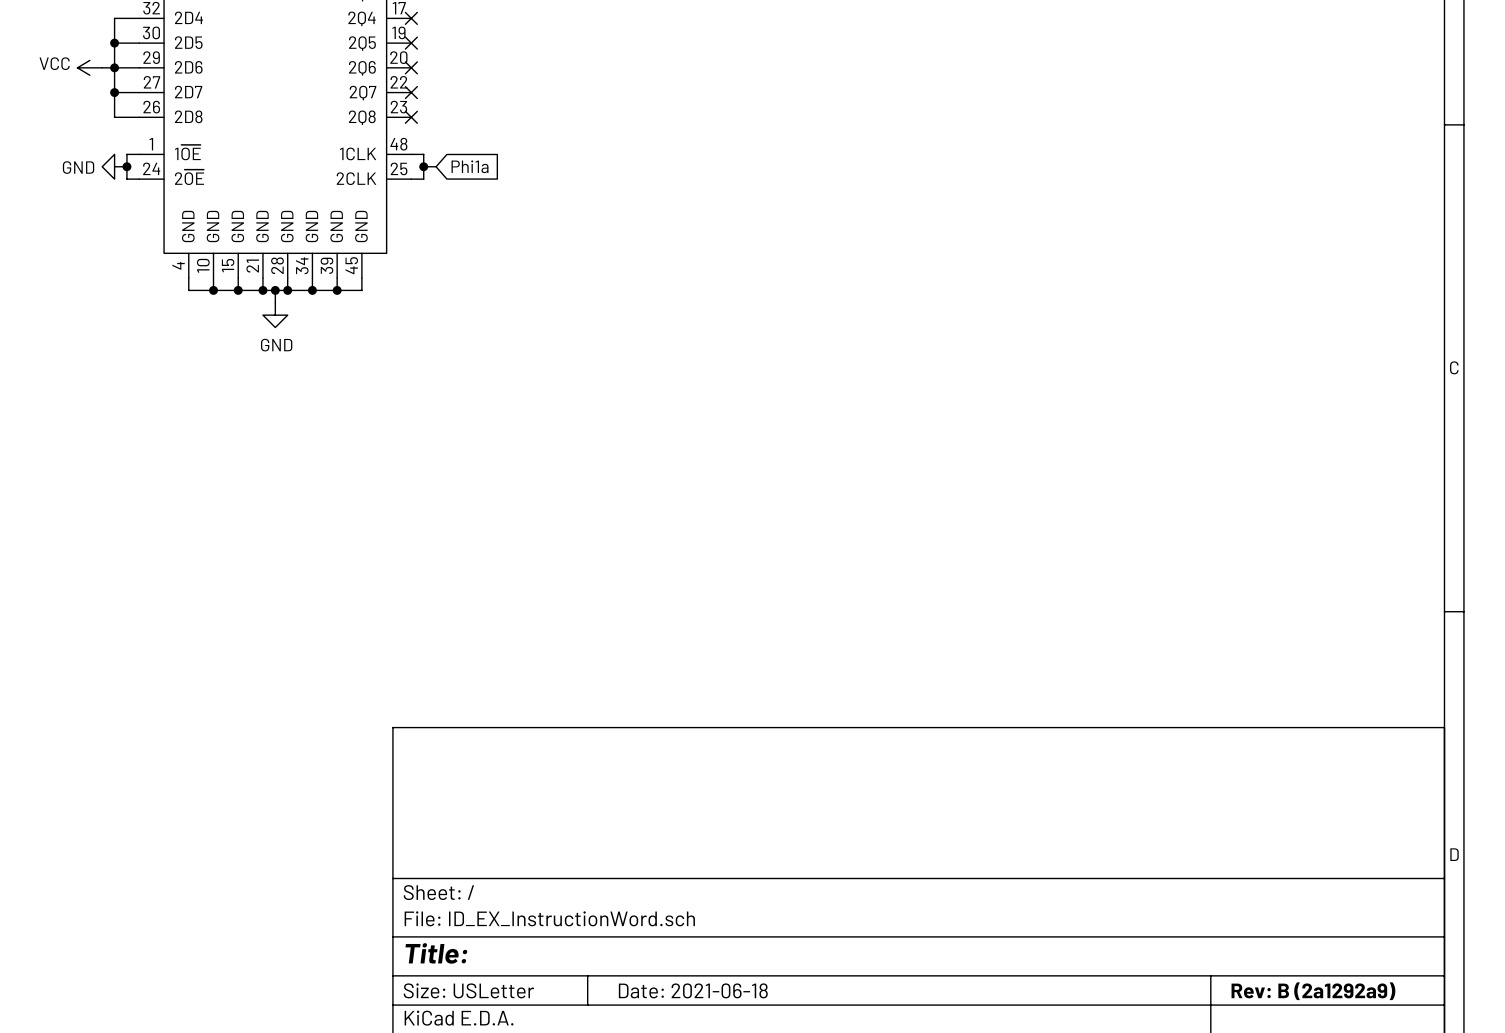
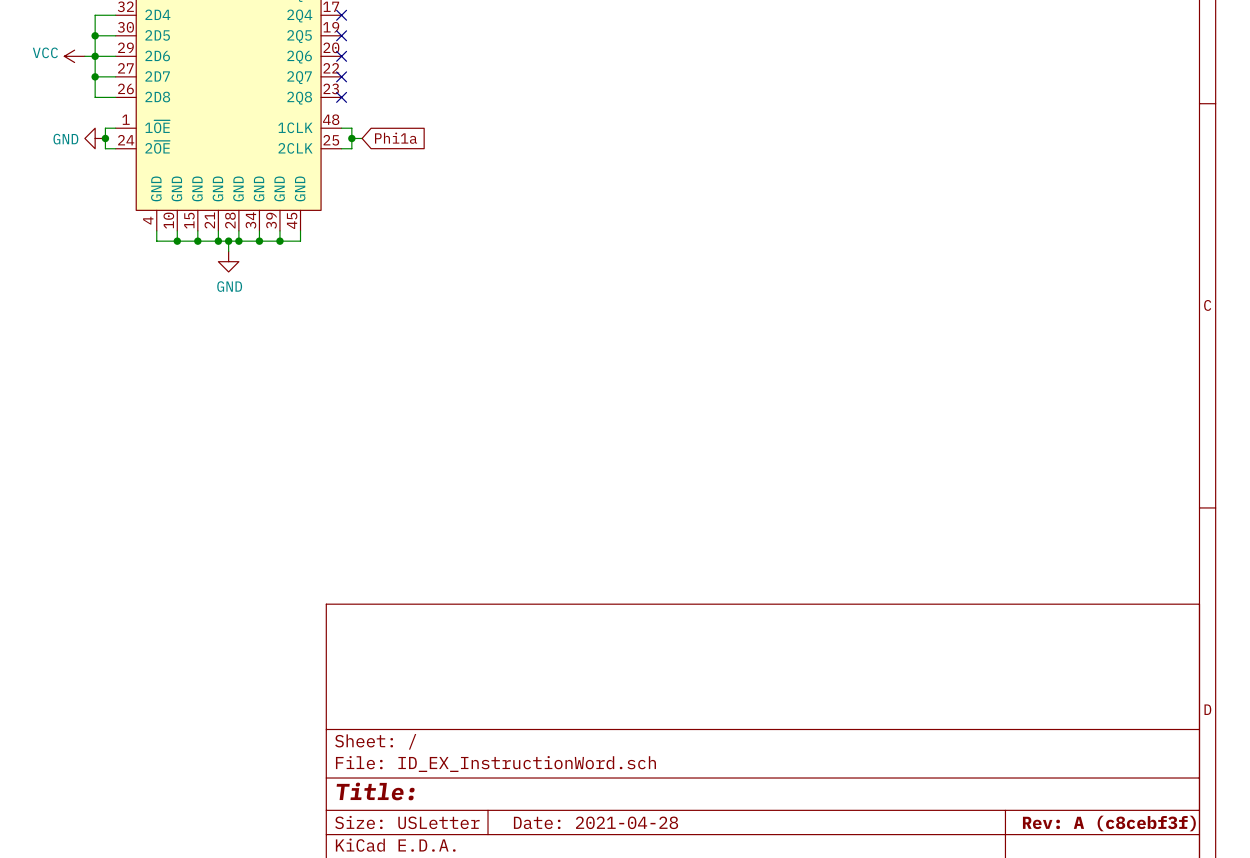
title block: Date: 2021-06-18 (693, 990) -> Date: 2021-04-28 (596, 822)
title block: Rev: B (2a1292a9) (1313, 991) -> Rev: A (c8cebf3f) (1109, 823)

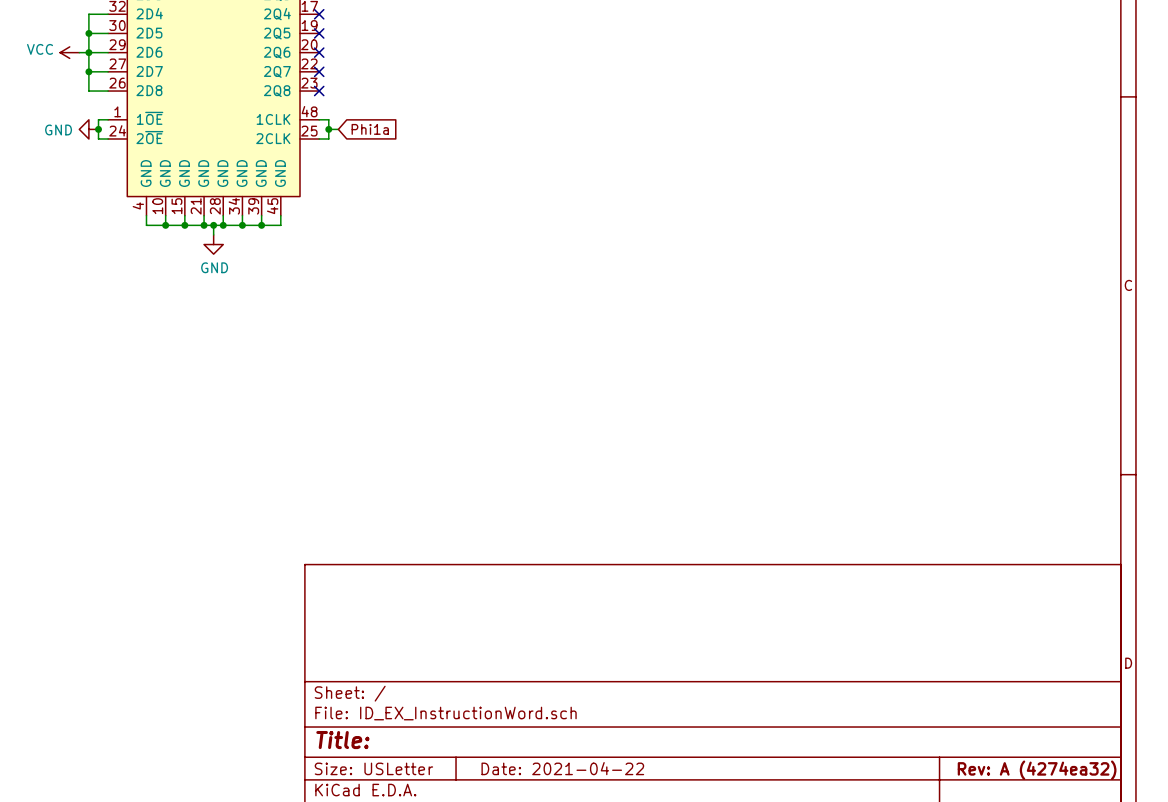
title block: Date: 2021-04-28 (596, 822) -> Date: 2021-04-22 (562, 768)
title block: Rev: A (c8cebf3f) (1109, 823) -> Rev: A (4274ea32) (1037, 770)

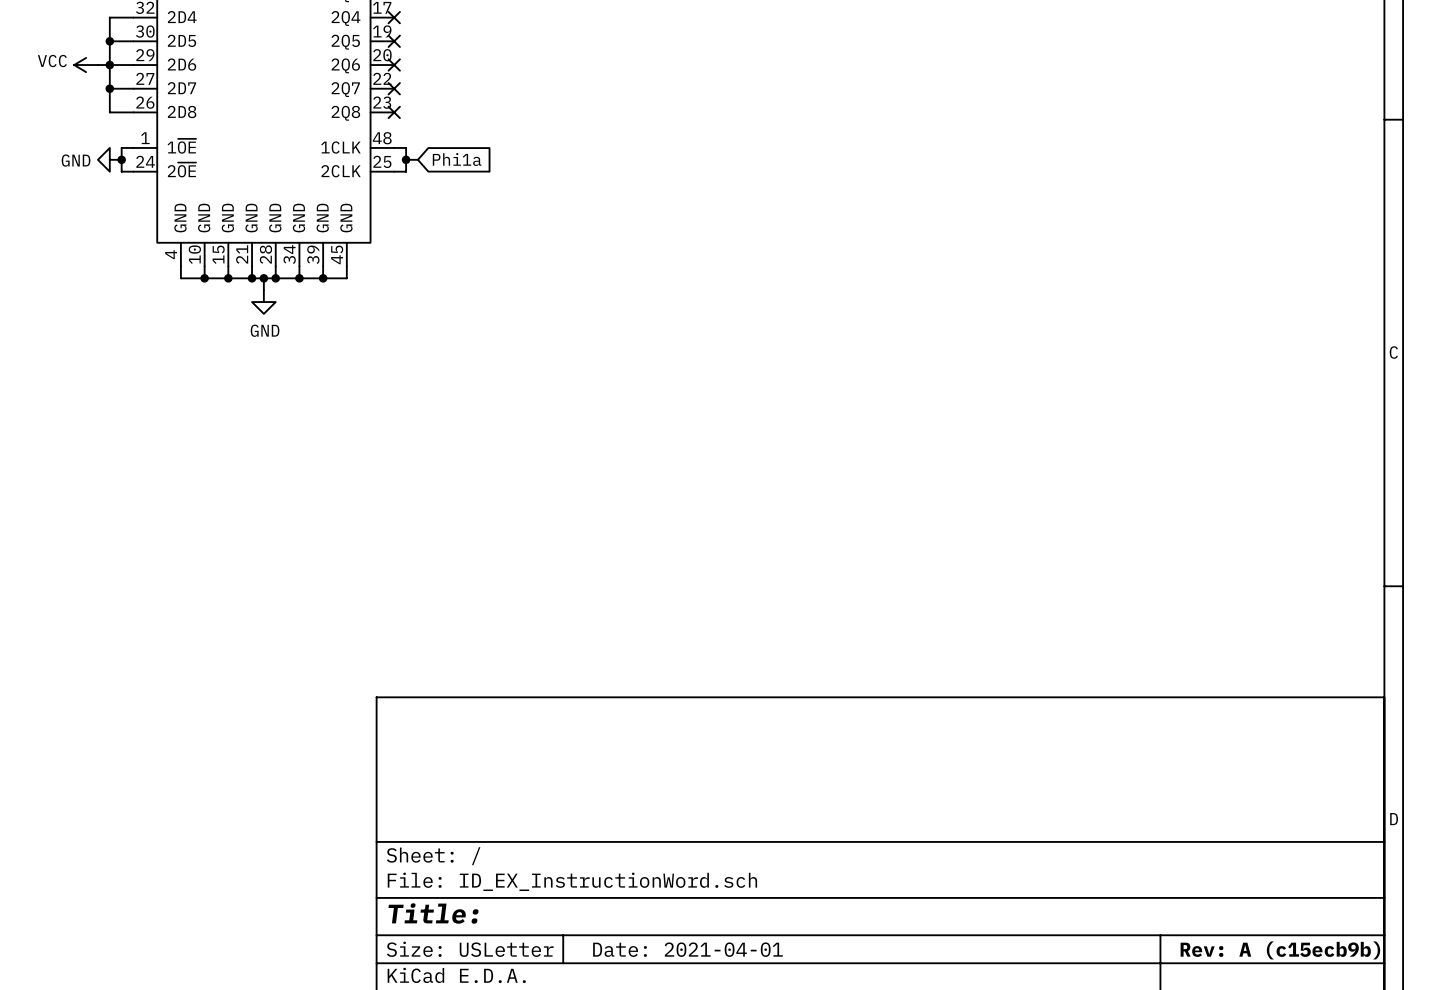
title block: Date: 2021-04-22 (562, 768) -> Date: 2021-04-01 (687, 949)
title block: Rev: A (4274ea32) (1037, 770) -> Rev: A (c15ecb9b) (1280, 950)

